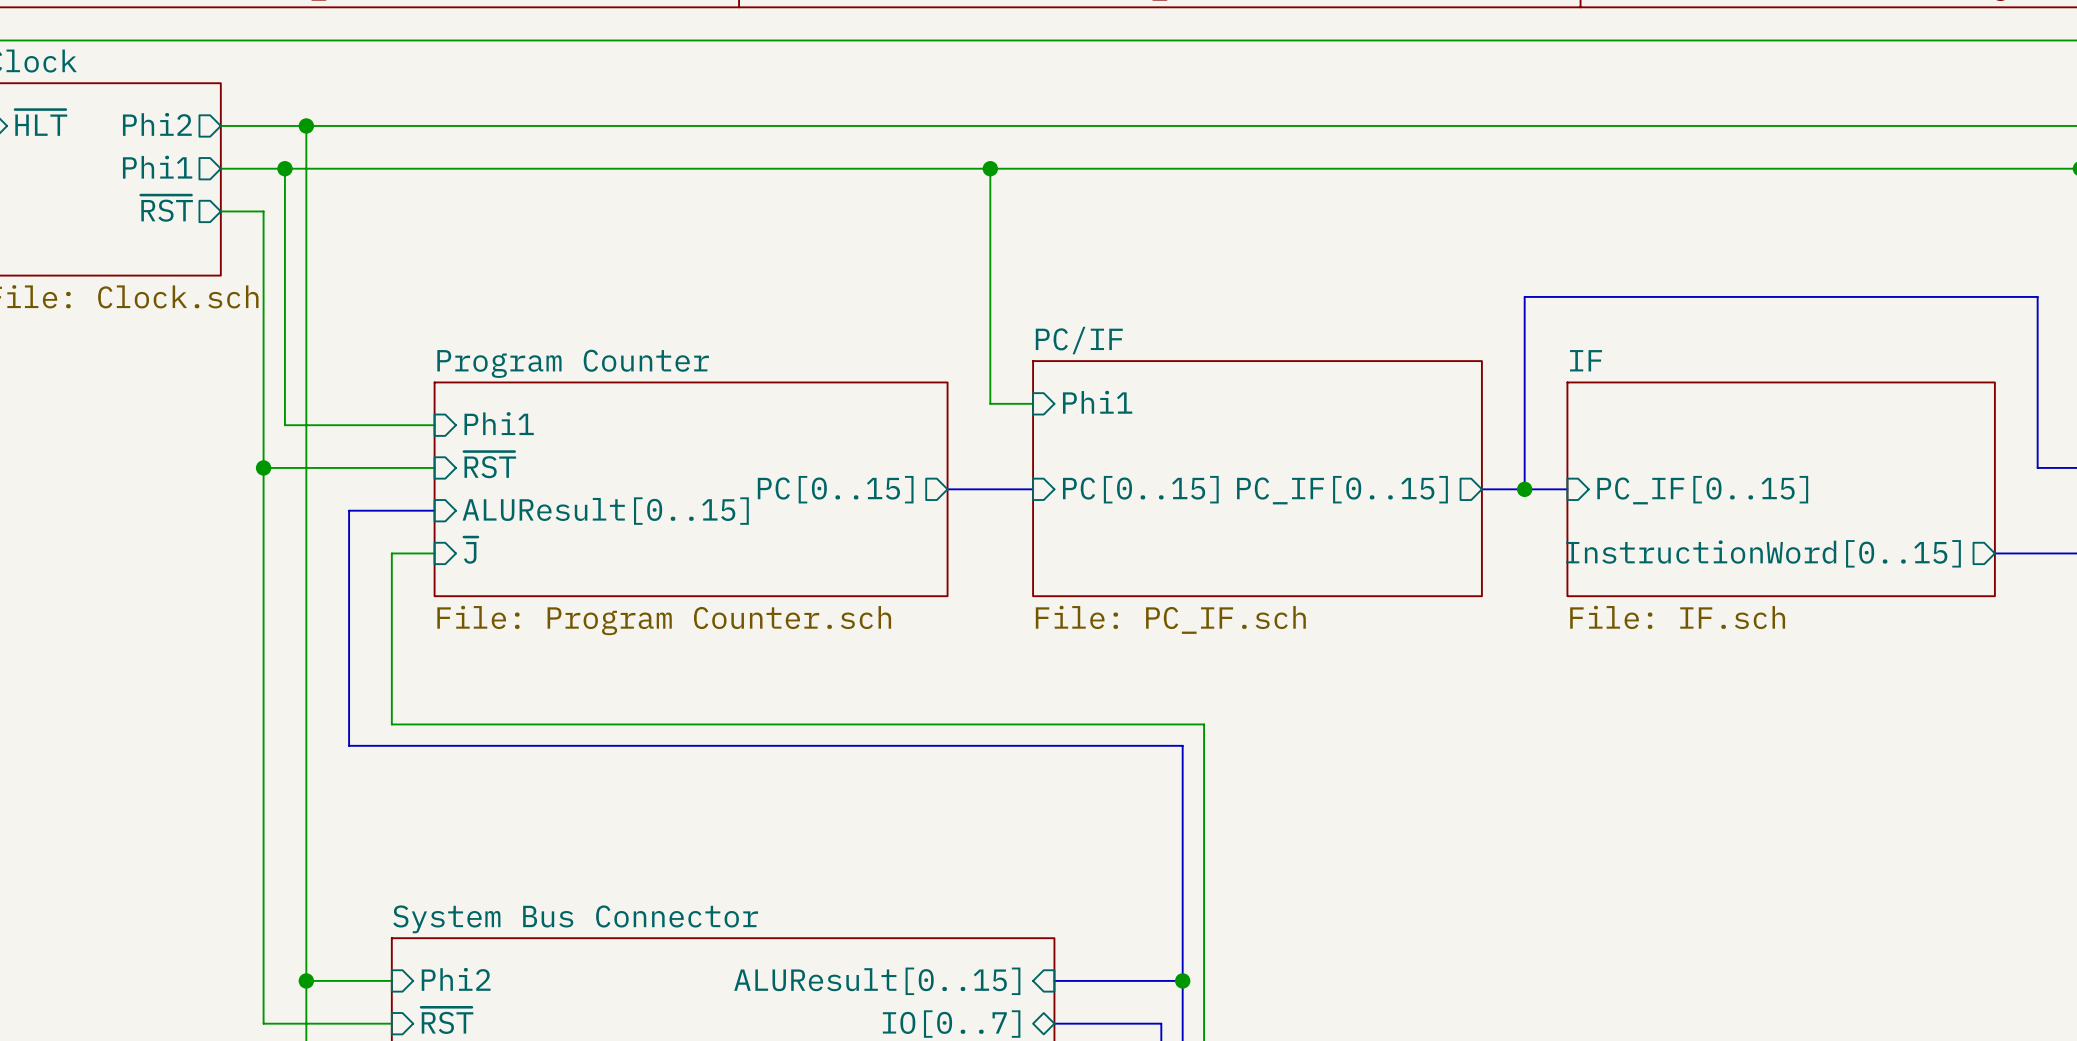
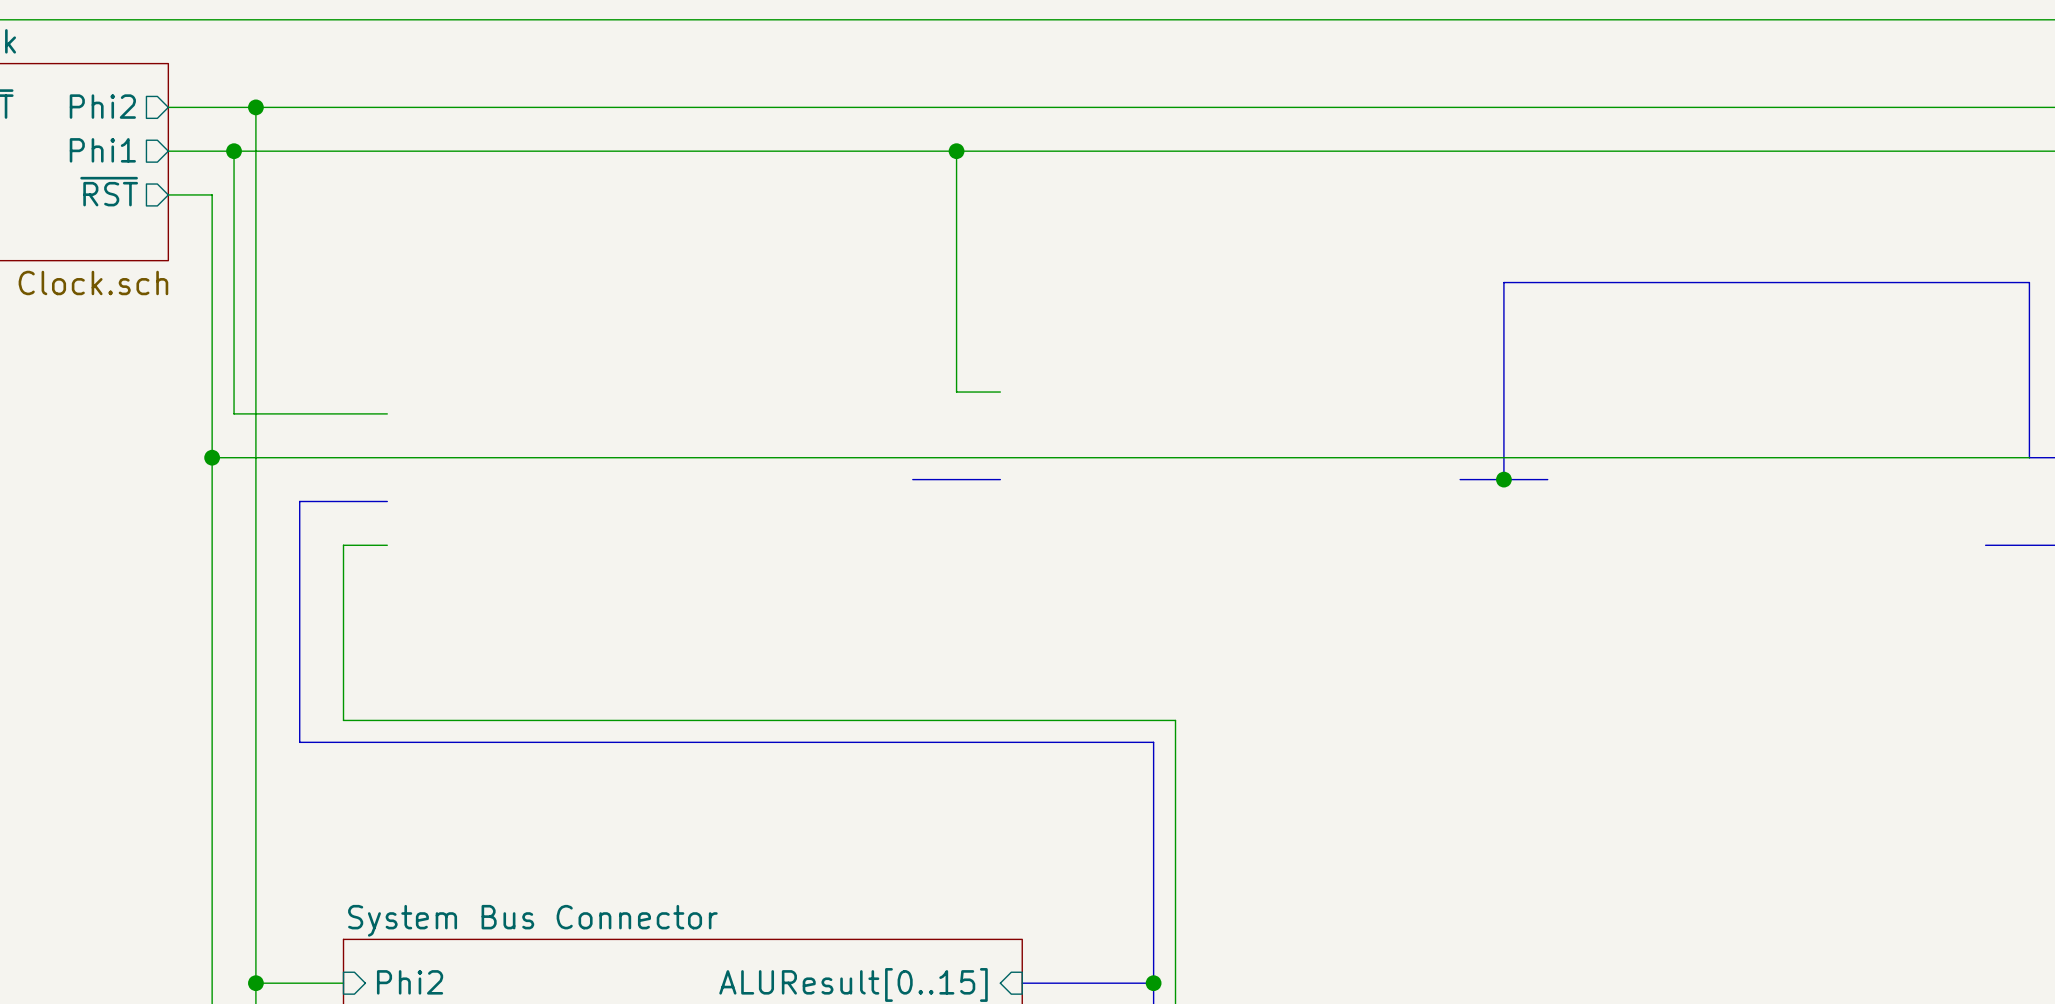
sheet pin: Phi1 (1097, 402) -> none
sheet pin: Phi1 (499, 423) -> none
sheet pin: ~{RST} (489, 464) -> none
wire: none -> (387, 457) (2029, 457)
sheet PC/IF: File: PC_IF.sch (1257, 478) -> none
sheet Program Counter: File: Program Counter.sch (691, 489) -> none
sheet pin: PC[0..15] (835, 489) -> none
sheet pin: PC[0..15] (1140, 489) -> none
sheet IF: File: IF.sch (1781, 489) -> none
sheet pin: PC_IF[0..15] (1342, 490) -> none
sheet pin: PC_IF[0..15] (1702, 490) -> none
sheet pin: ALUResult[0..15] (605, 511) -> none
sheet pin: ~{J} (470, 550) -> none
sheet pin: InstructionWord[0..15] (1763, 553) -> none

